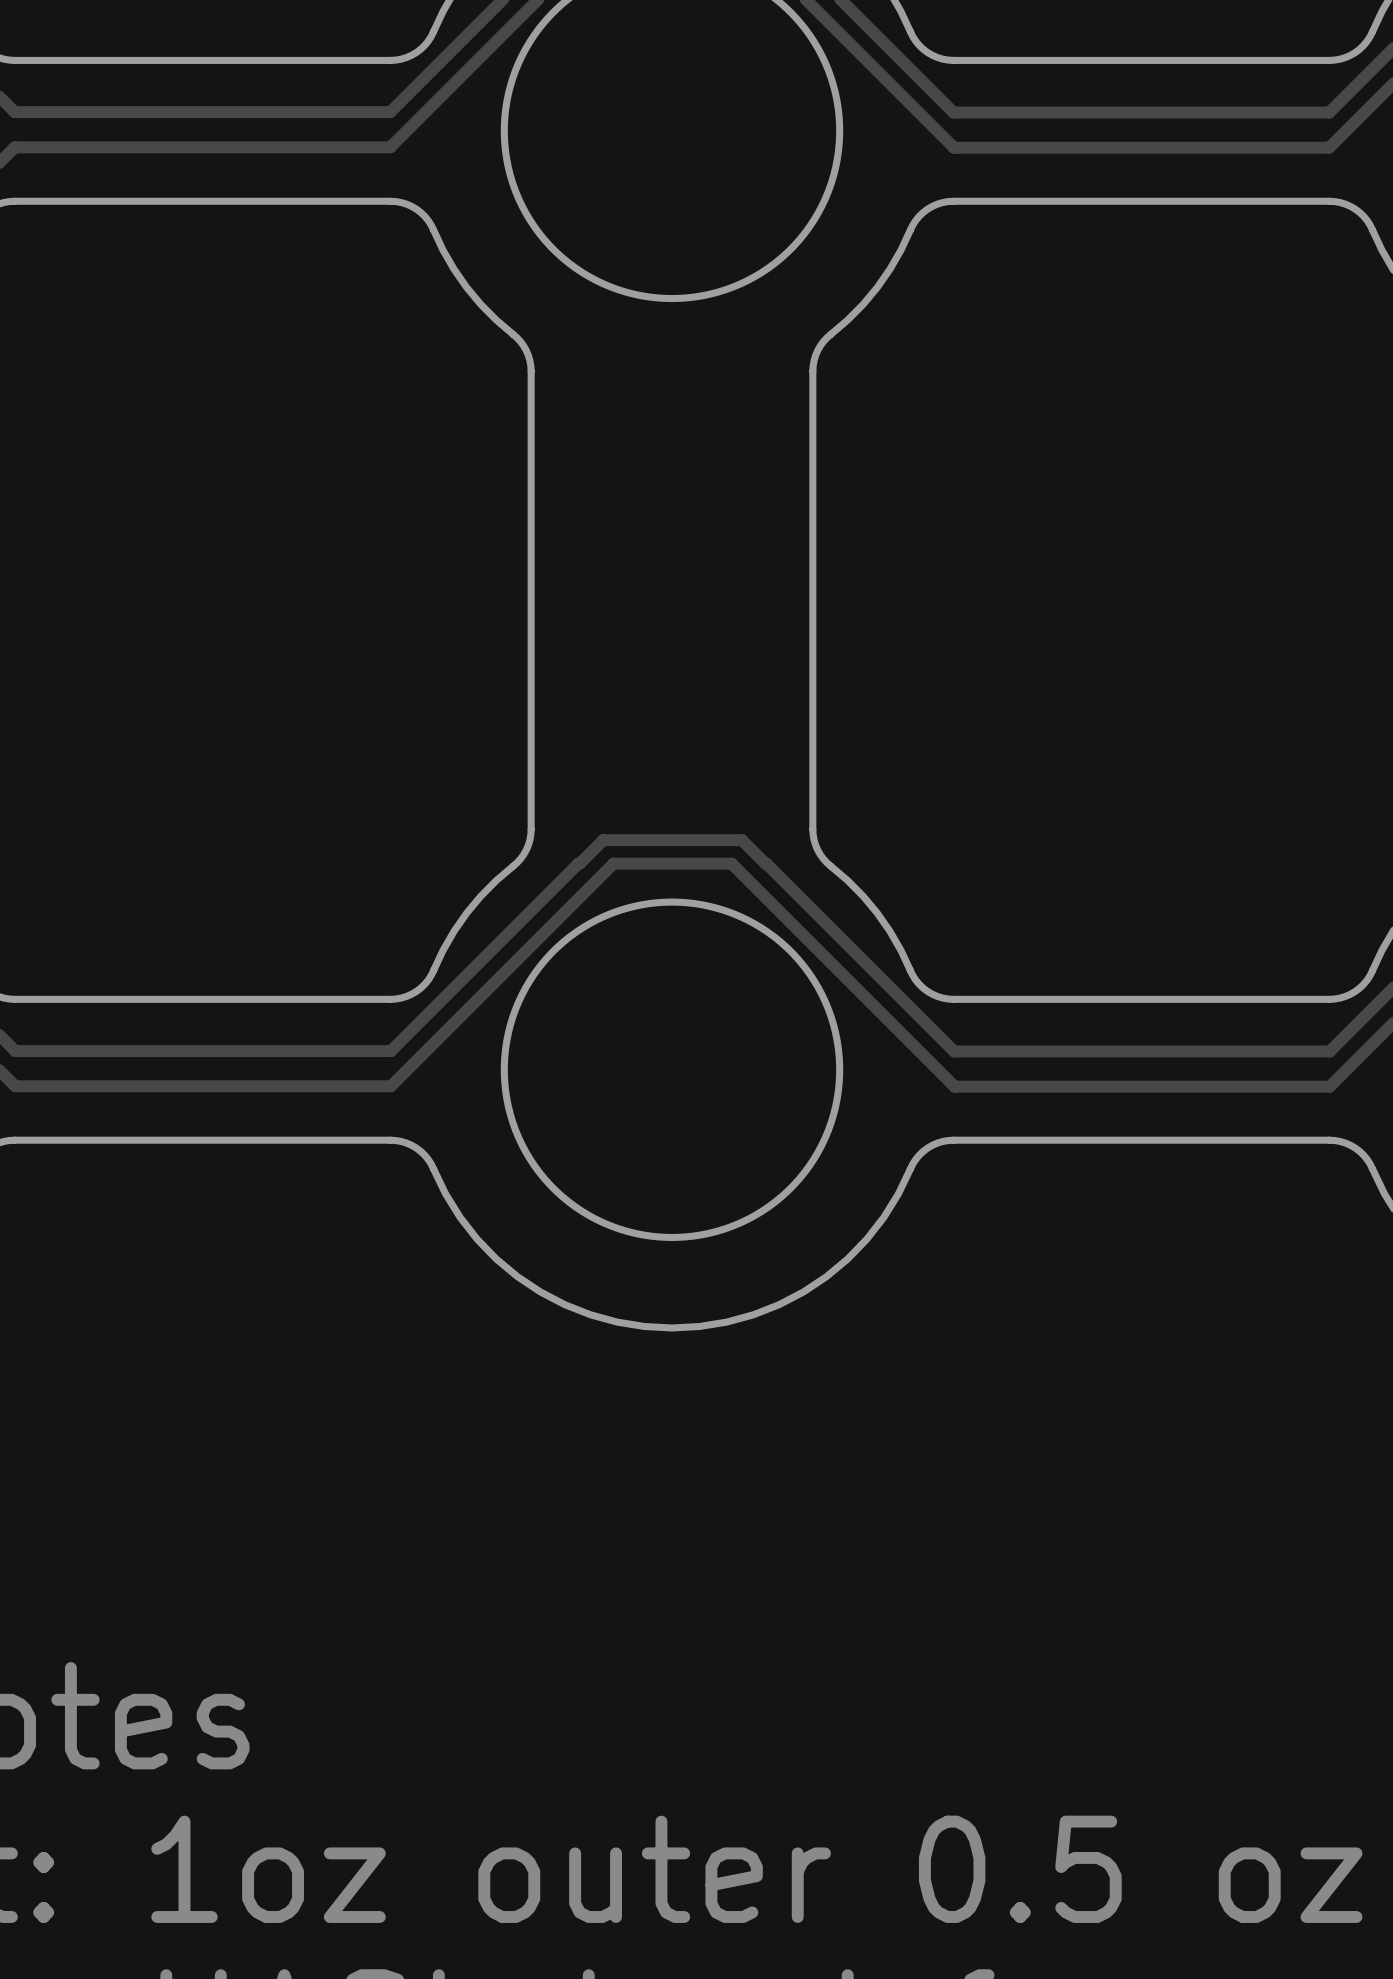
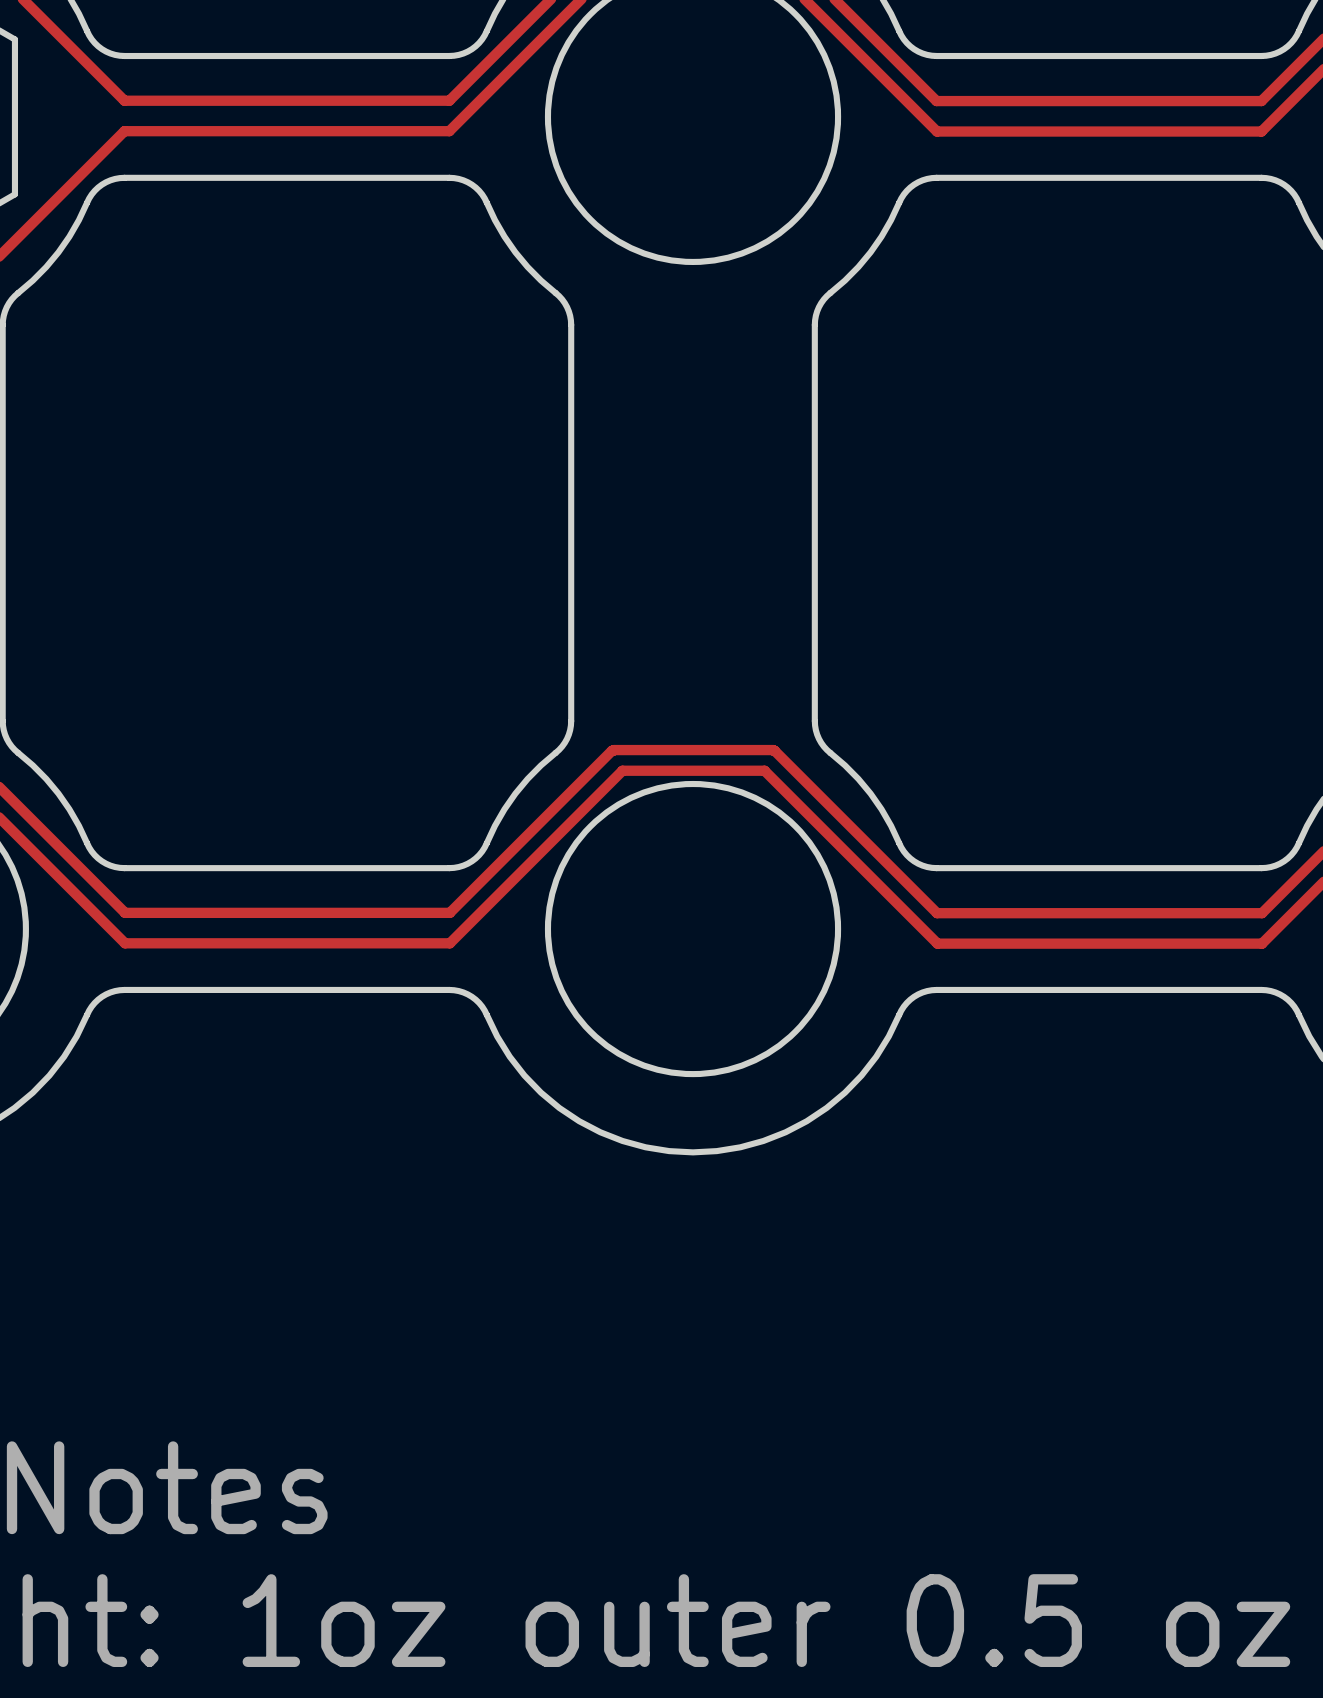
track: (580, 862) (603, 840) (742, 840) (765, 863) -> (613, 750) (773, 750)
track: (590, 886) (613, 863) (731, 863) (754, 886) -> (622, 770) (764, 770)

